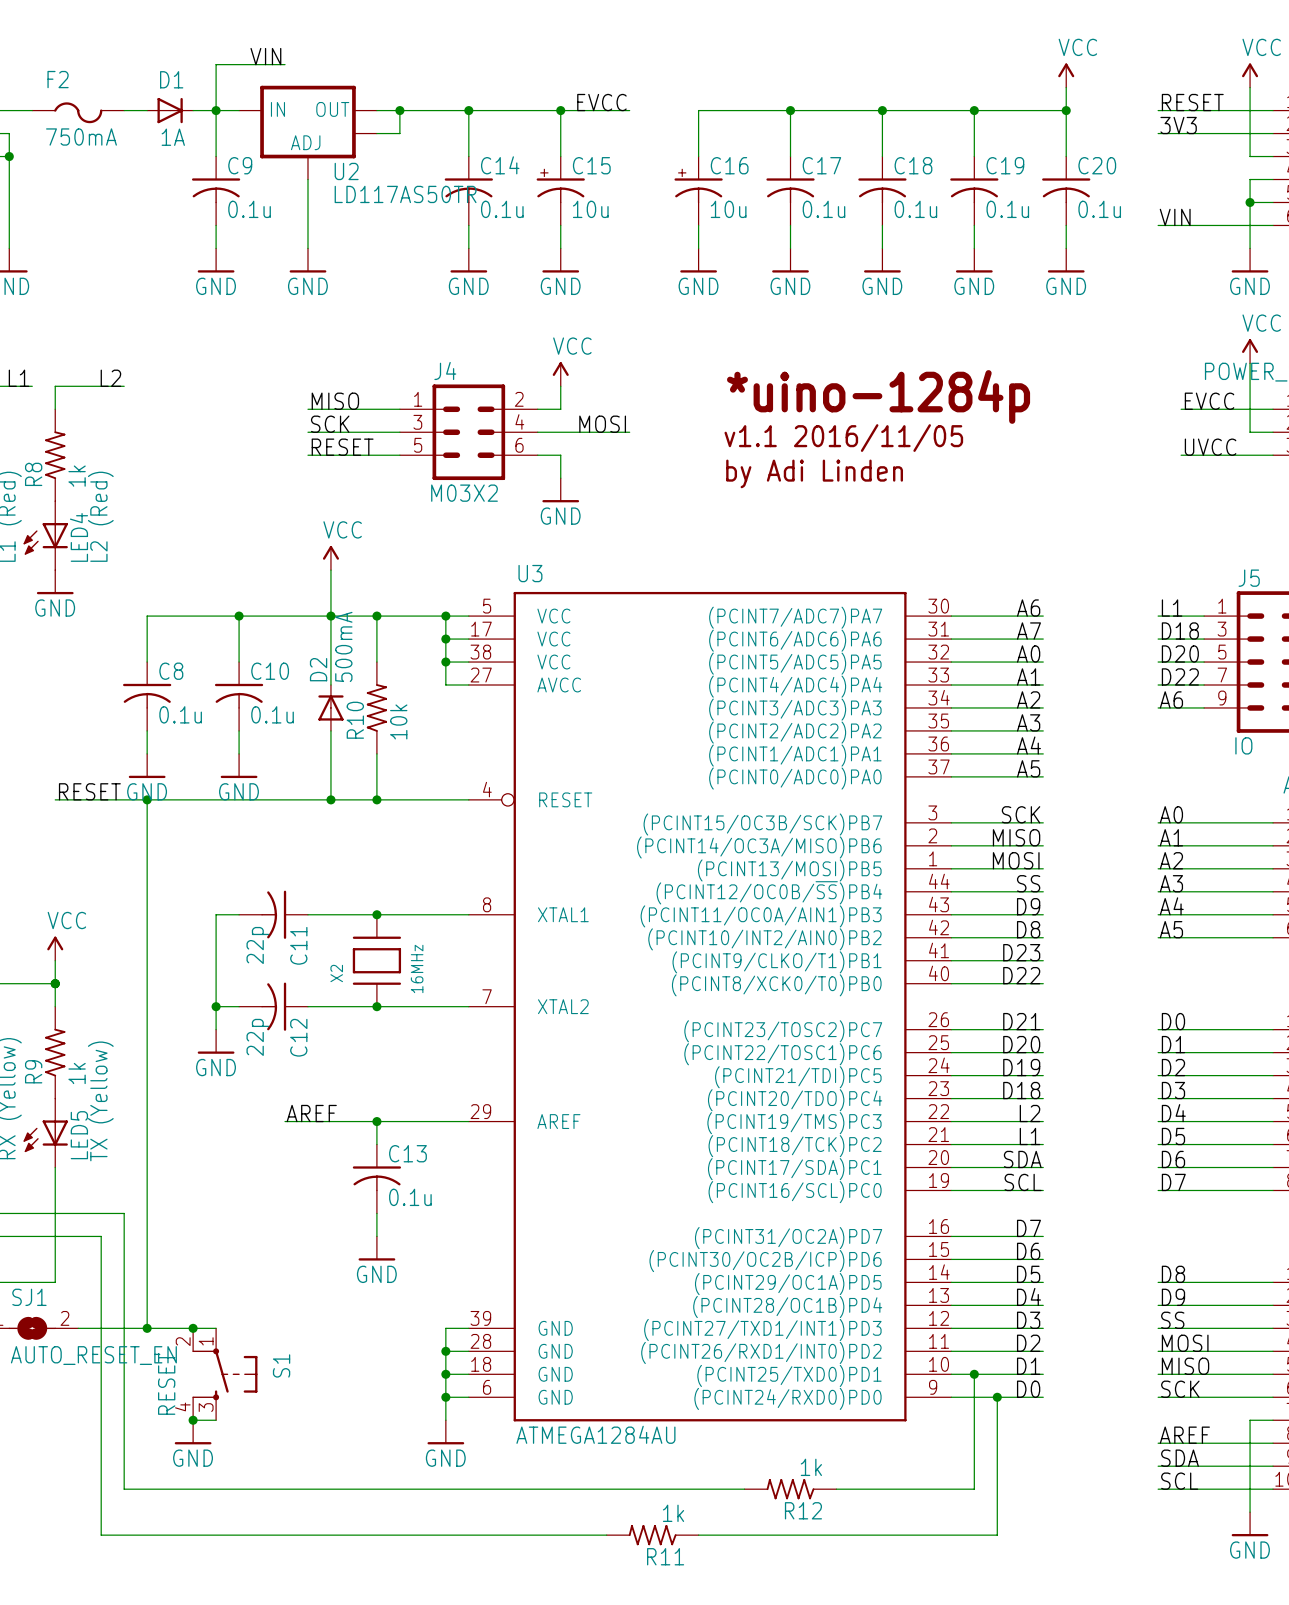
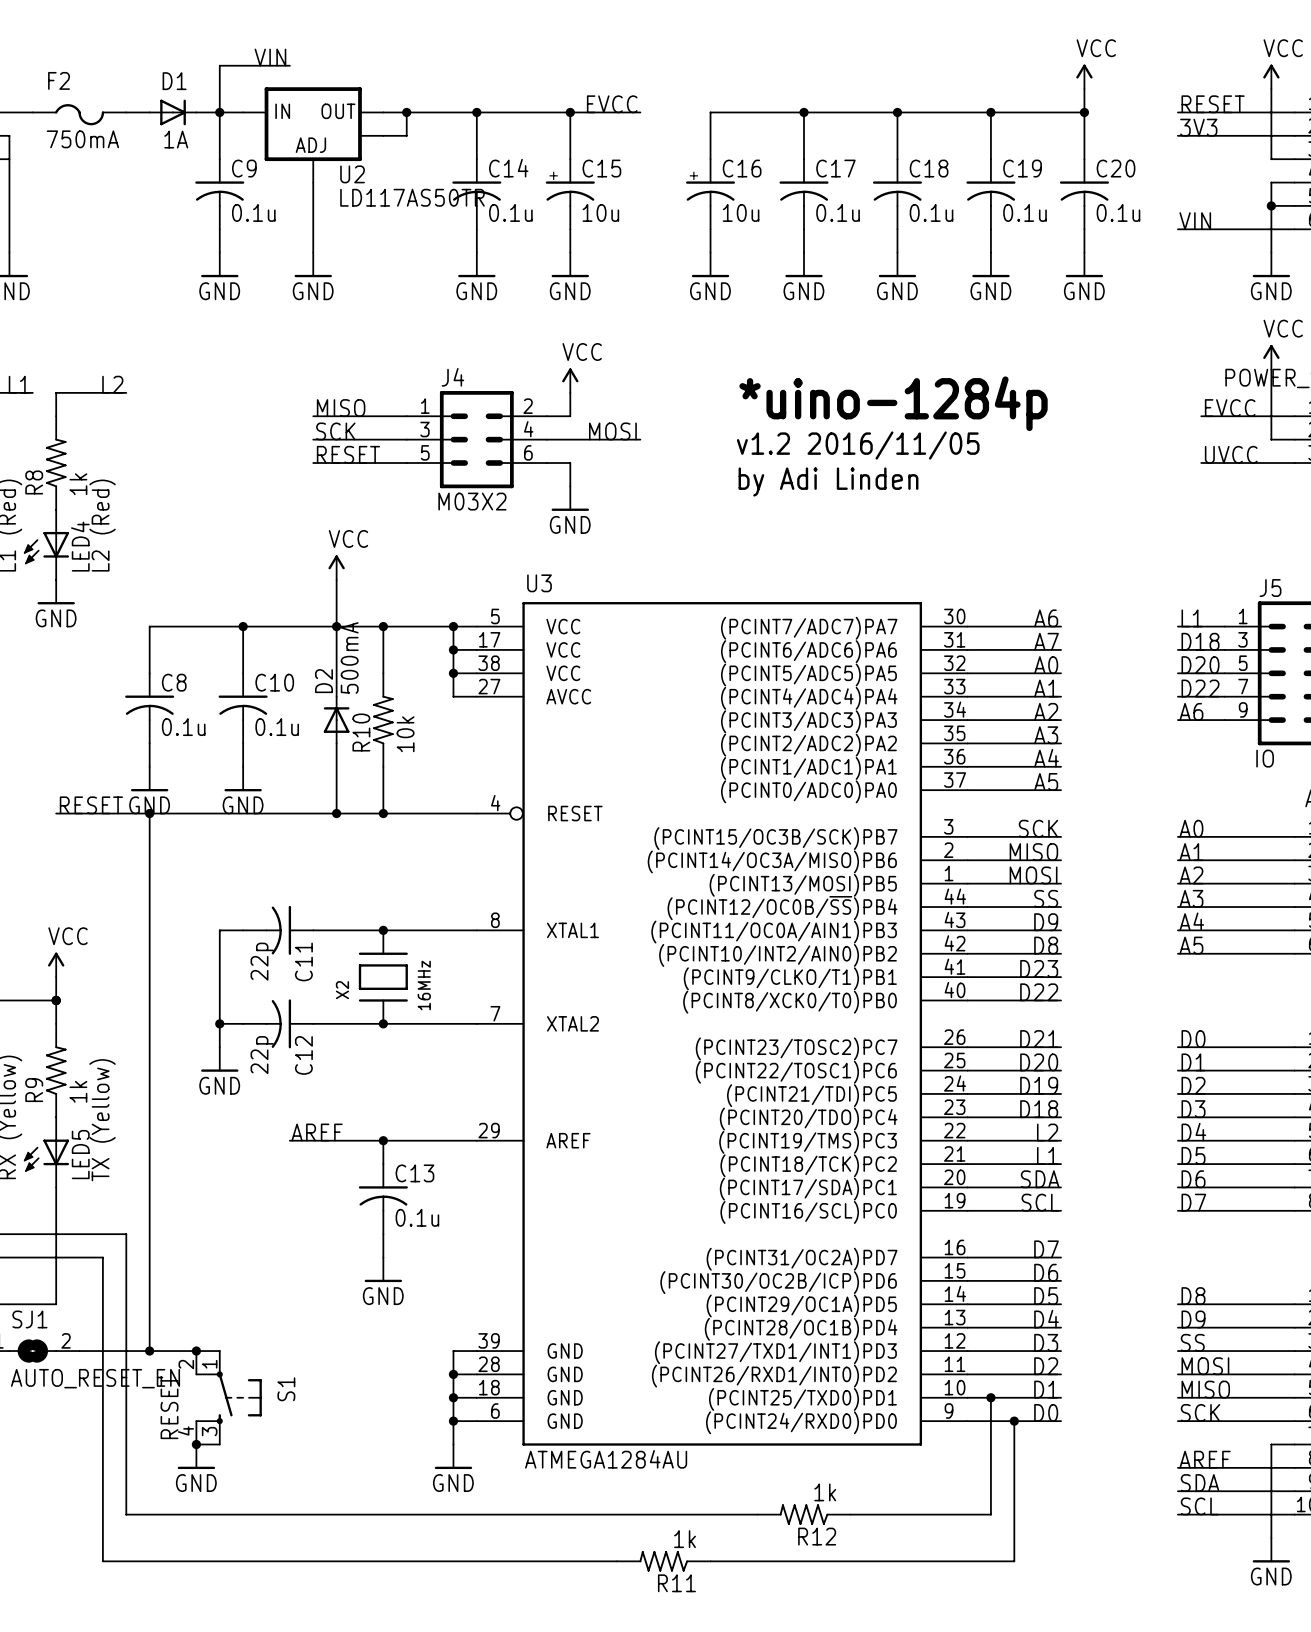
junction: (9, 156) -> none
text: v1.1 2016/11/05 (843, 438) -> v1.2 2016/11/05 (858, 445)

